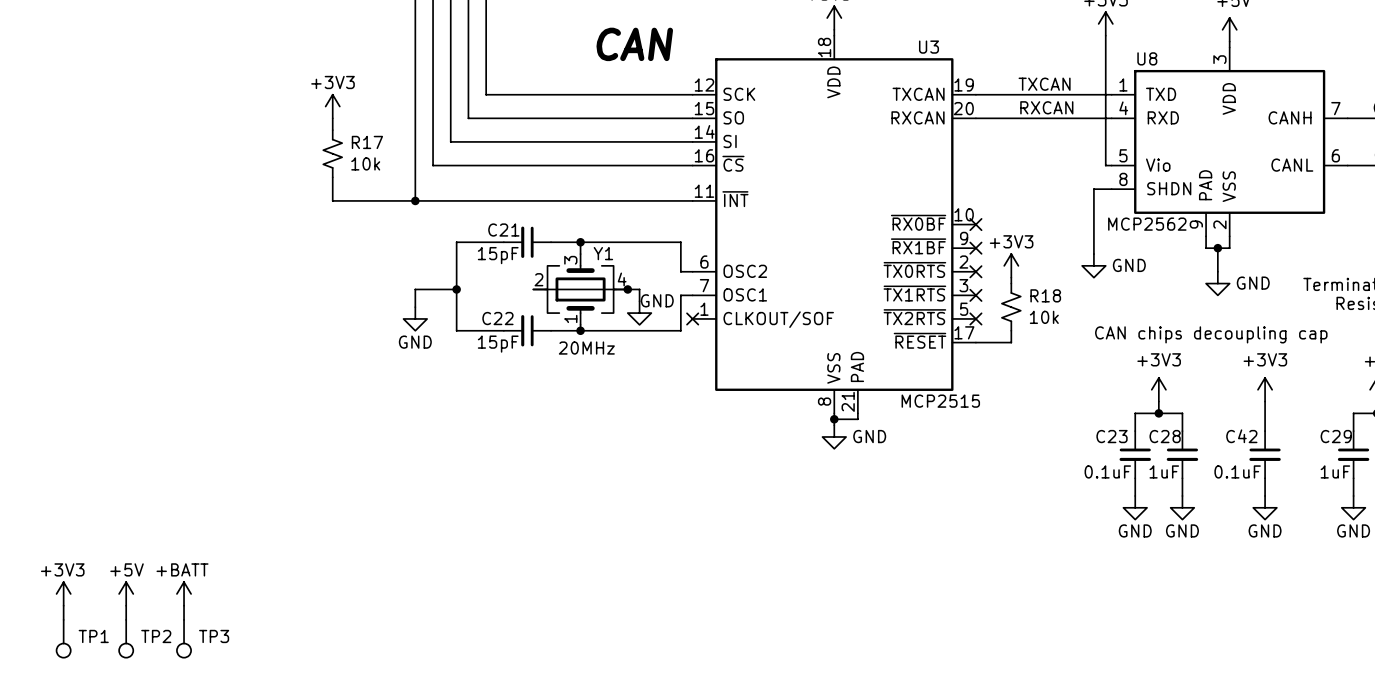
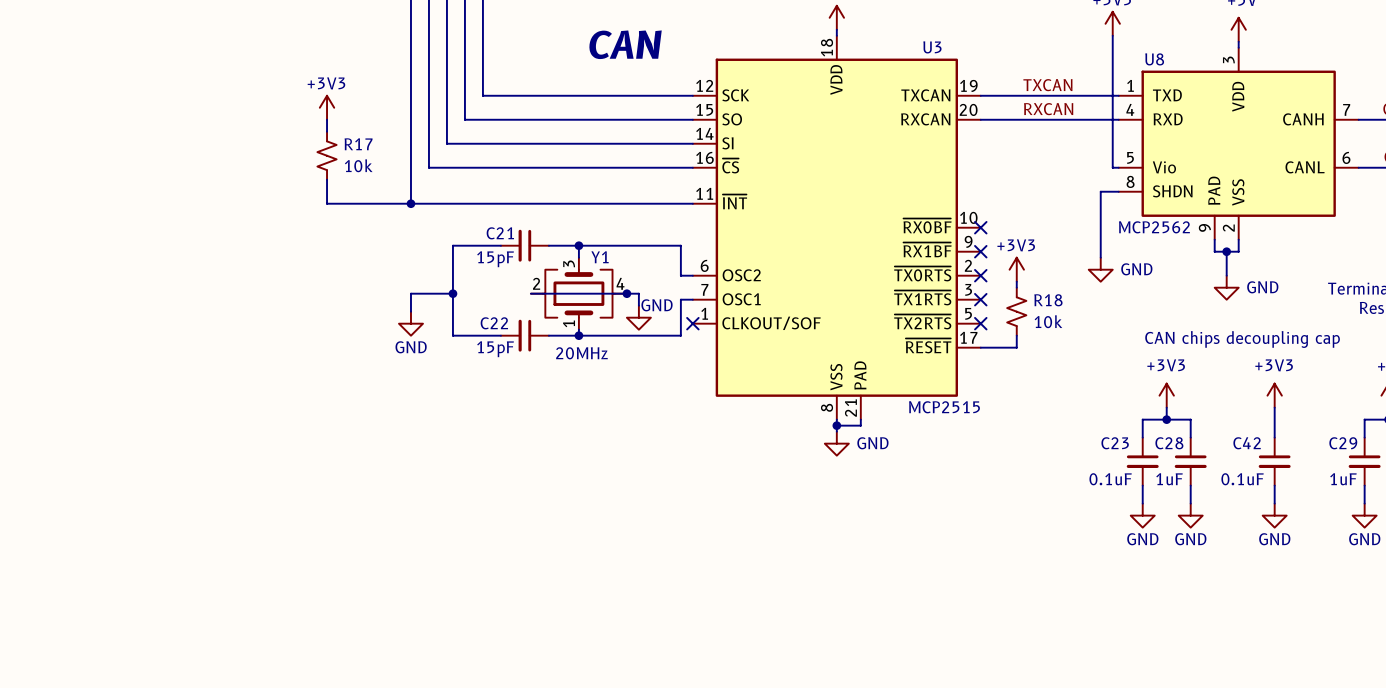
power symbol: +3V3 (63, 593) -> none
power symbol: +5V (126, 593) -> none
power symbol: +BATT (184, 593) -> none
wire: (63, 605) (63, 619) -> none
wire: (126, 605) (126, 619) -> none
wire: (184, 605) (184, 619) -> none
TP1: (63, 638) -> none
TP2: (126, 638) -> none
TP3: (184, 638) -> none

